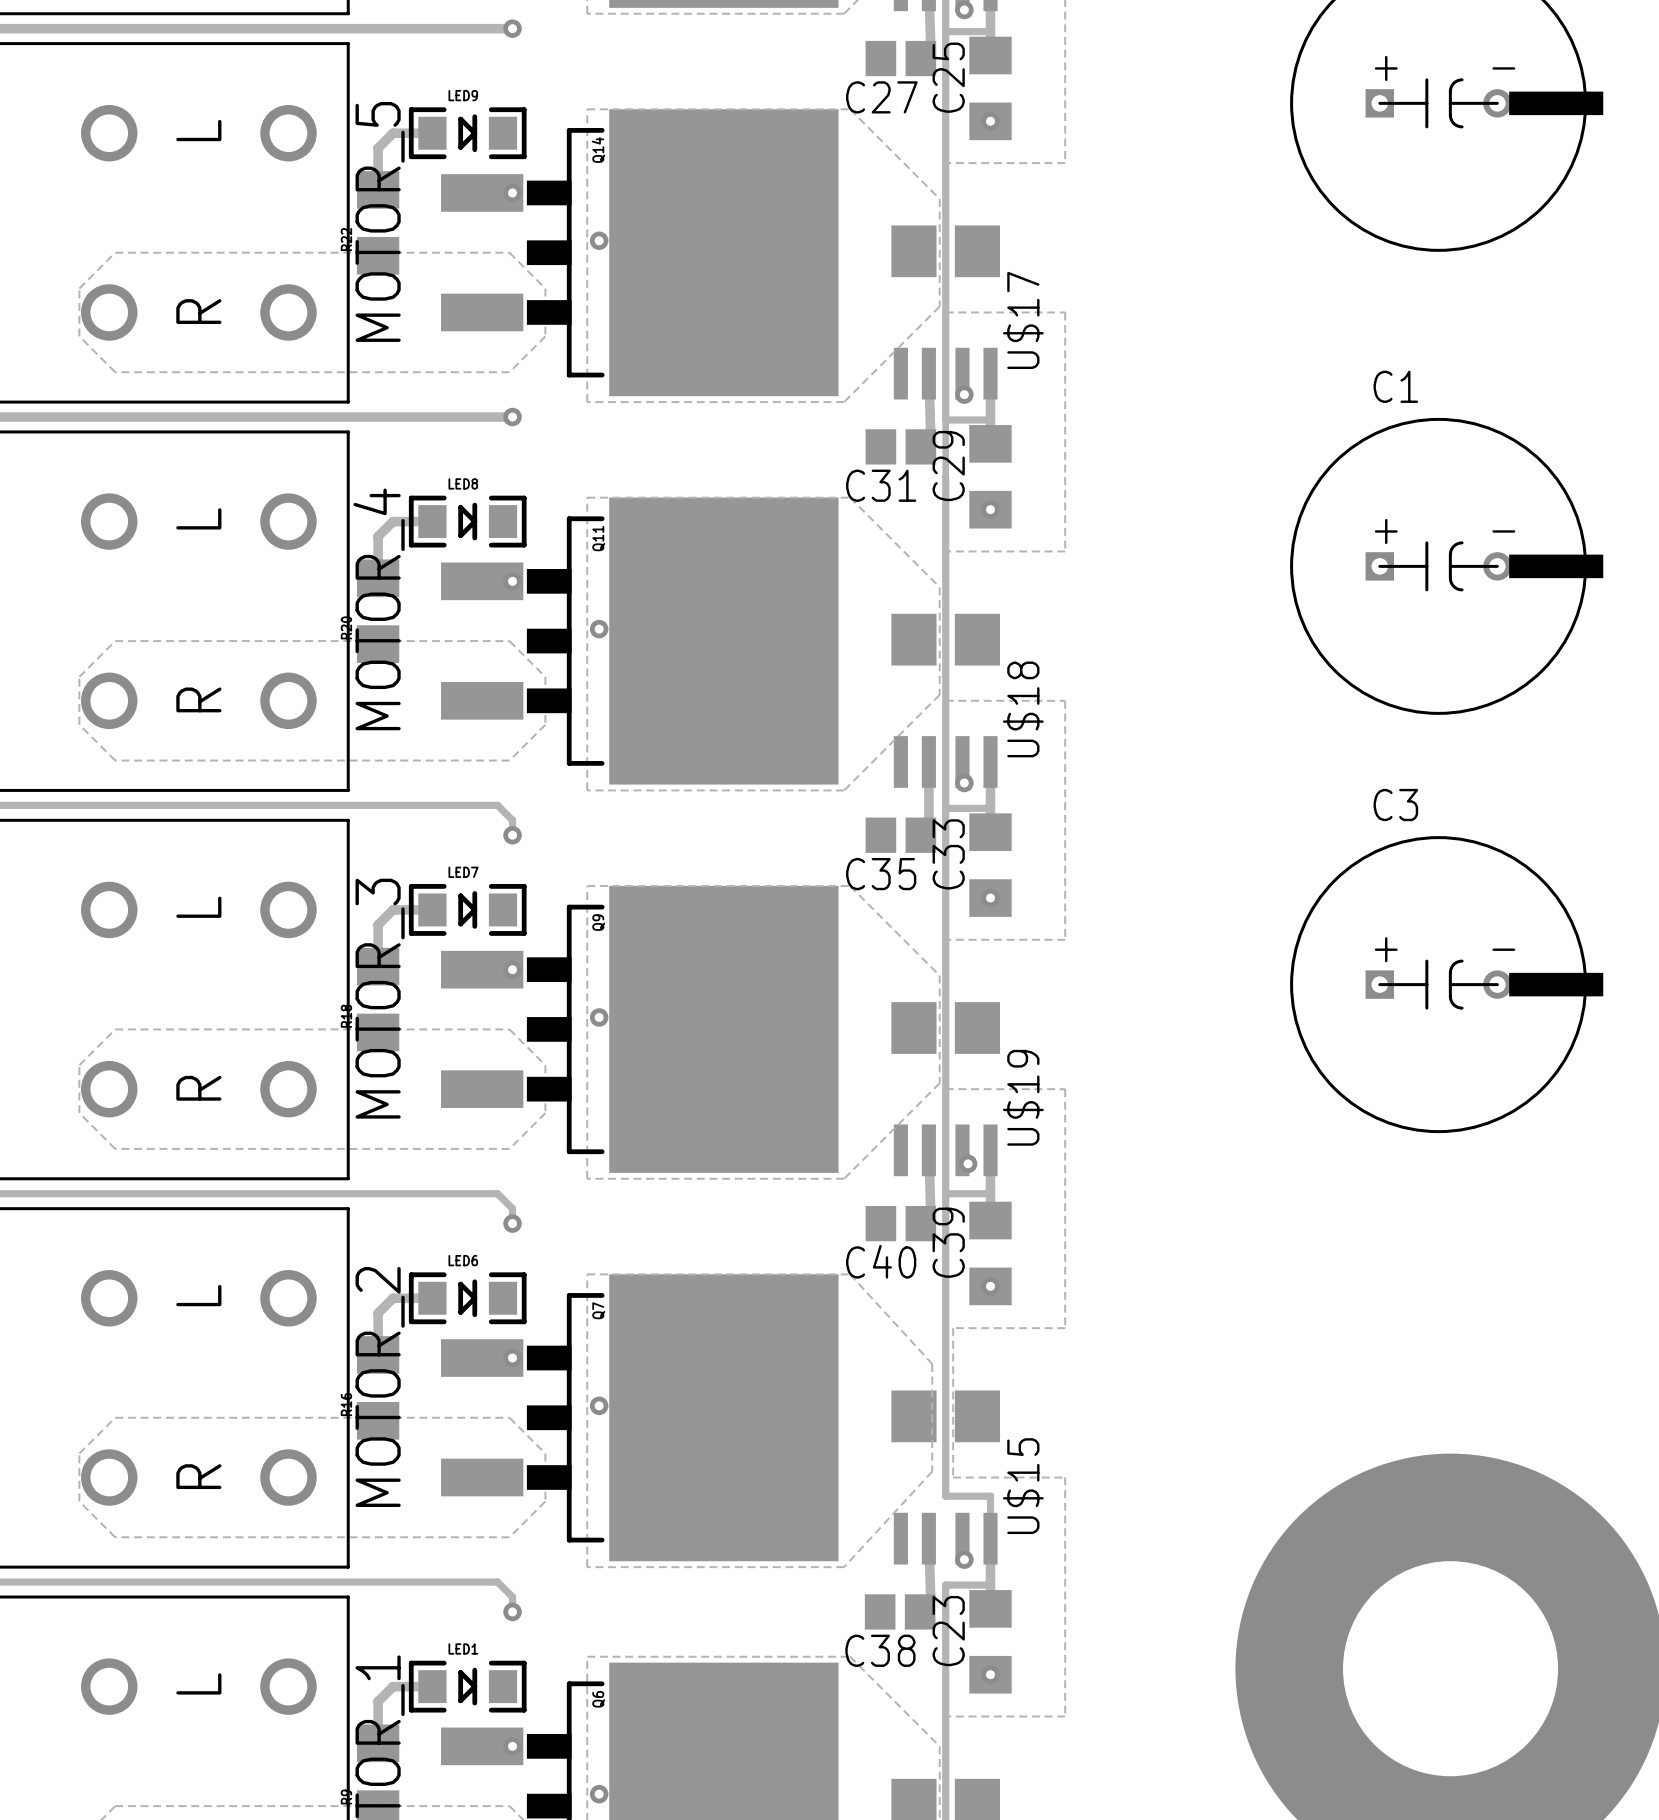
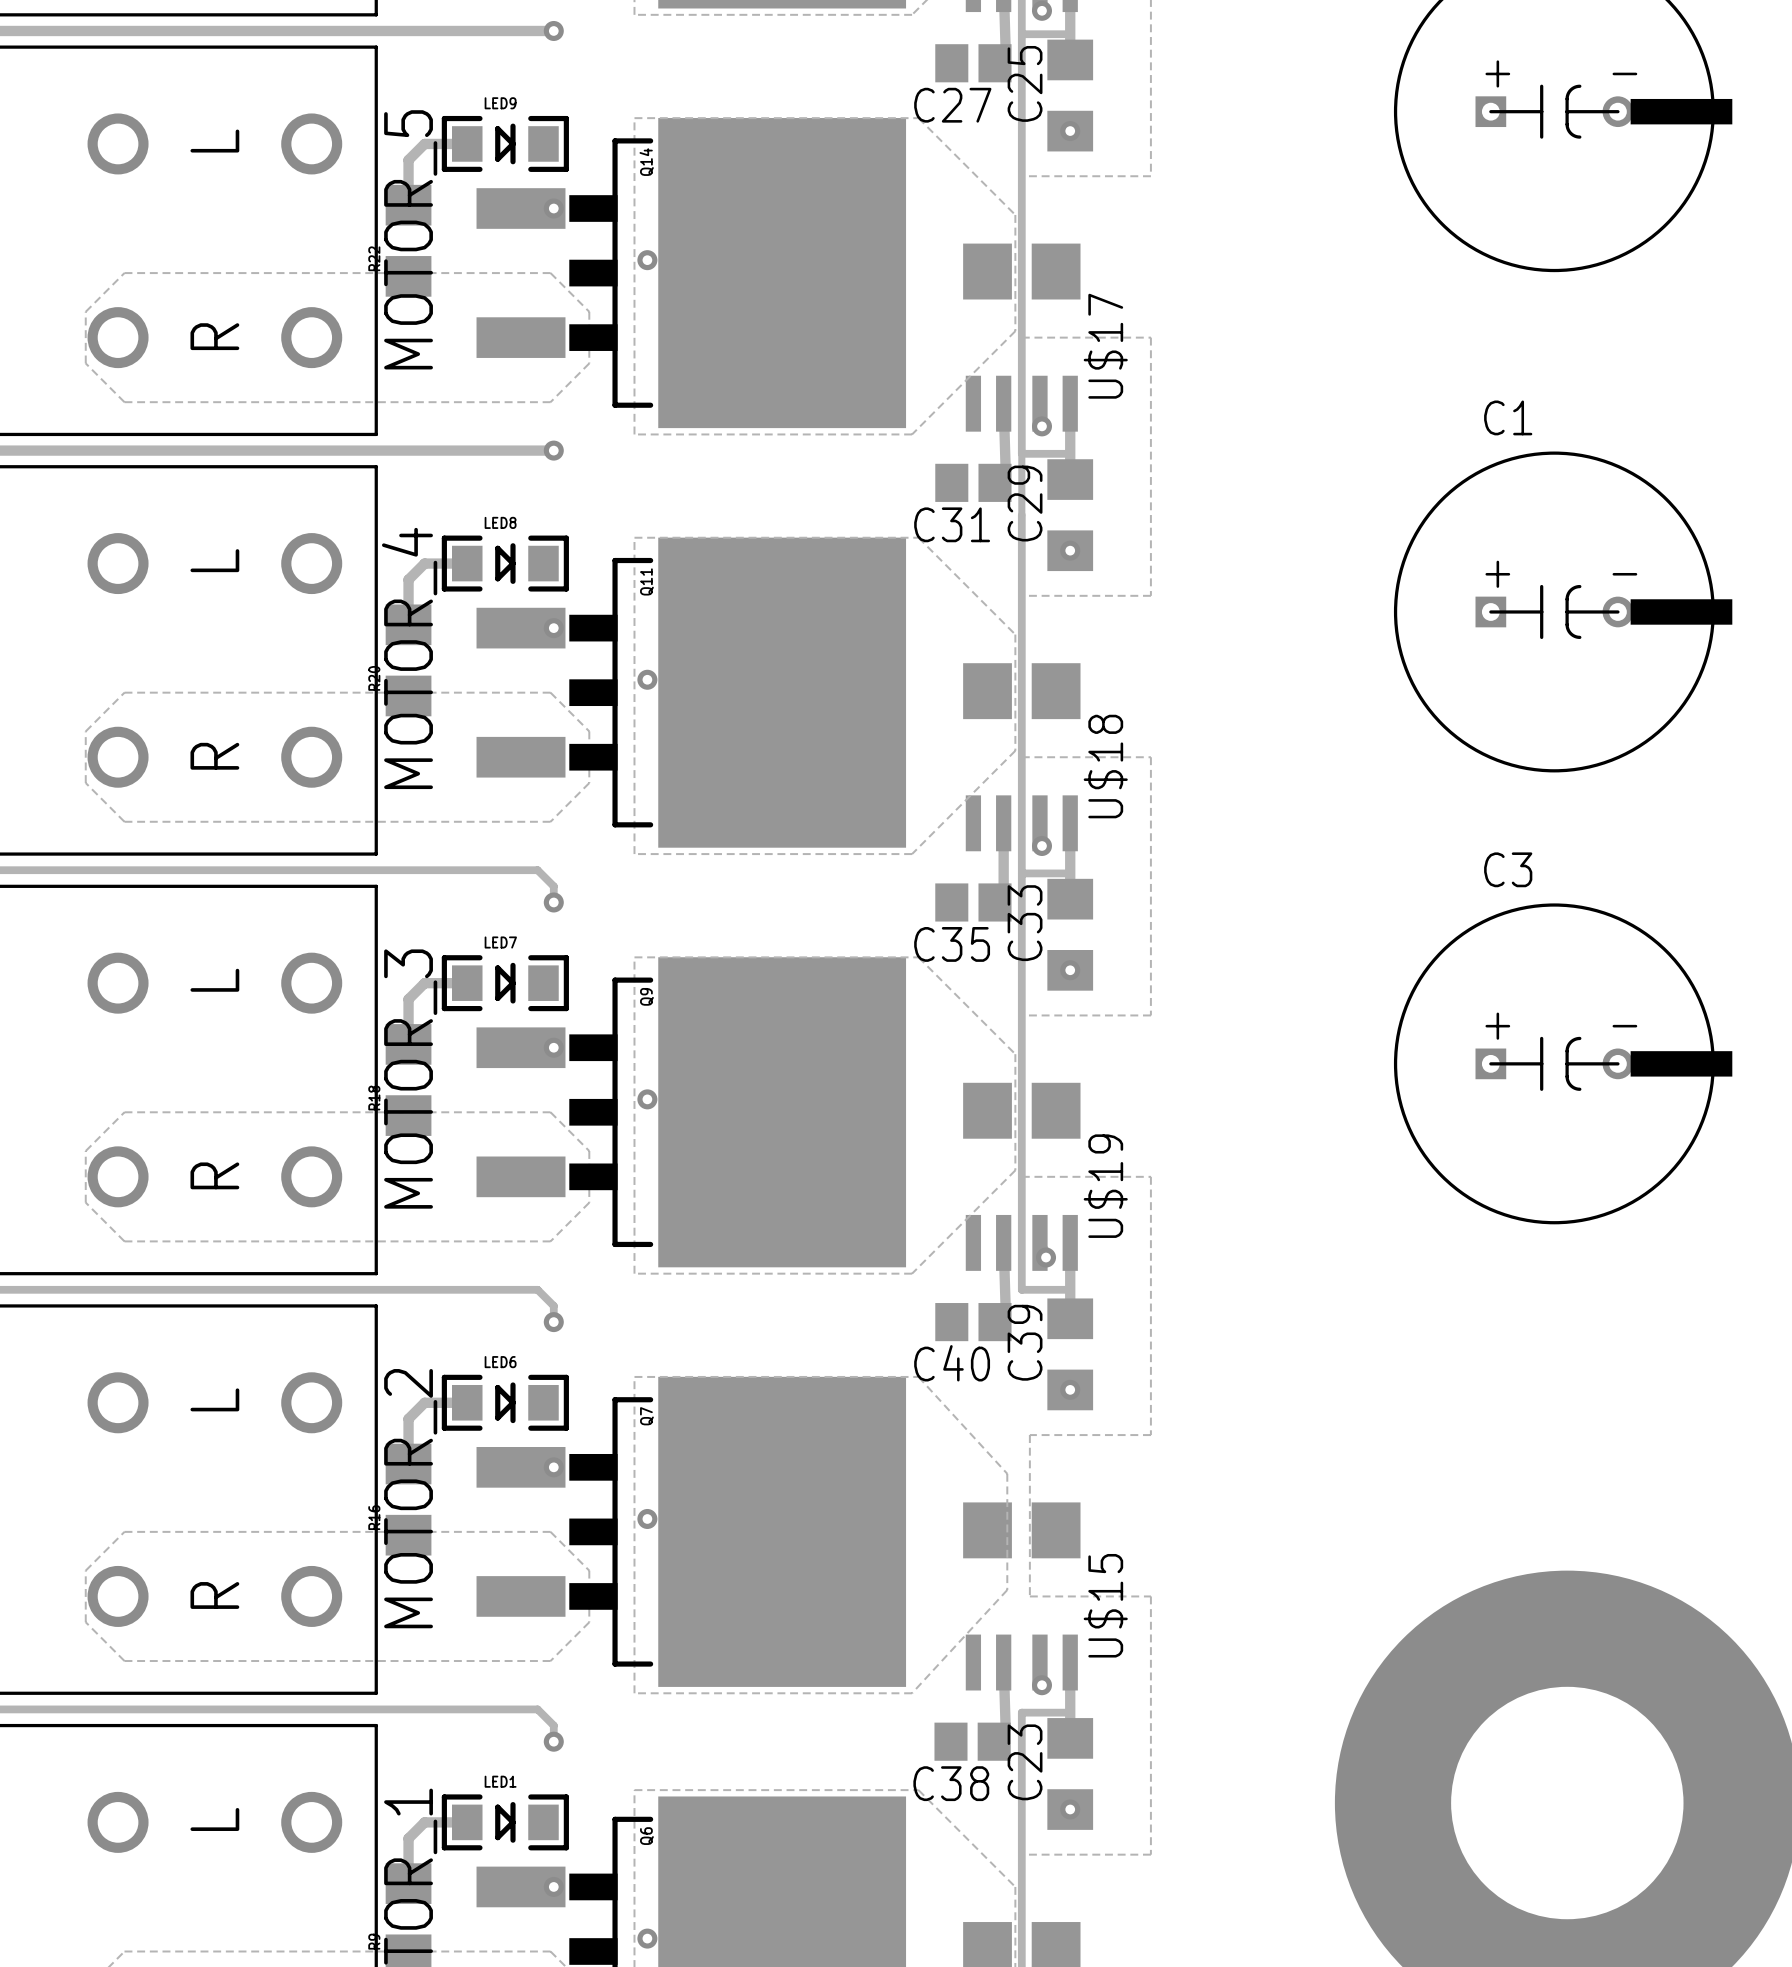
track: (945, 1193) (945, 1496) (990, 1496) (990, 1538) -> none

